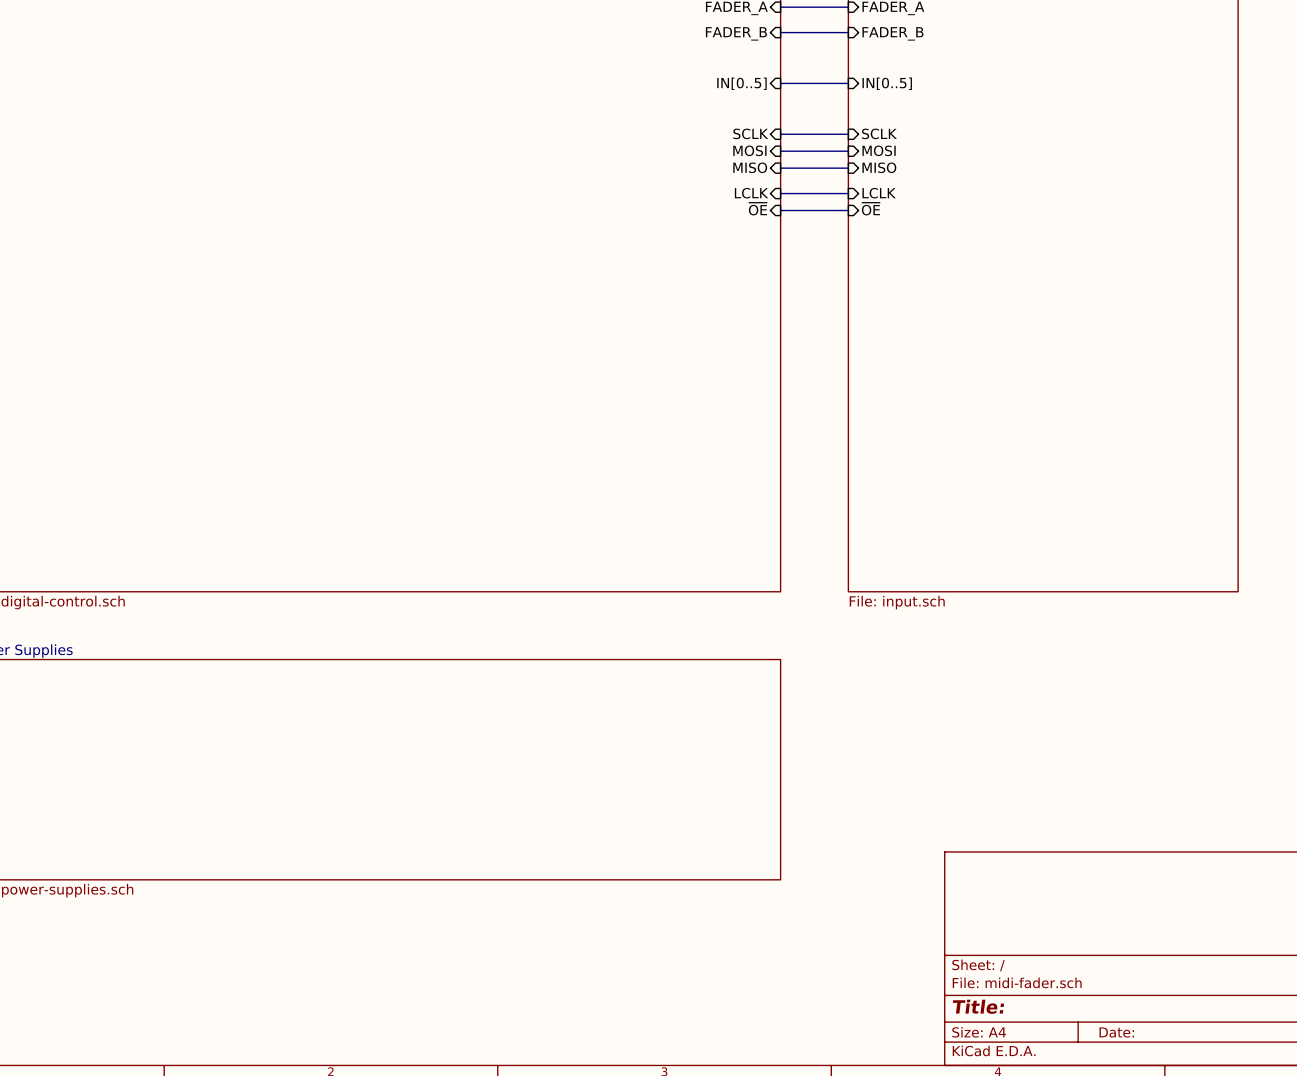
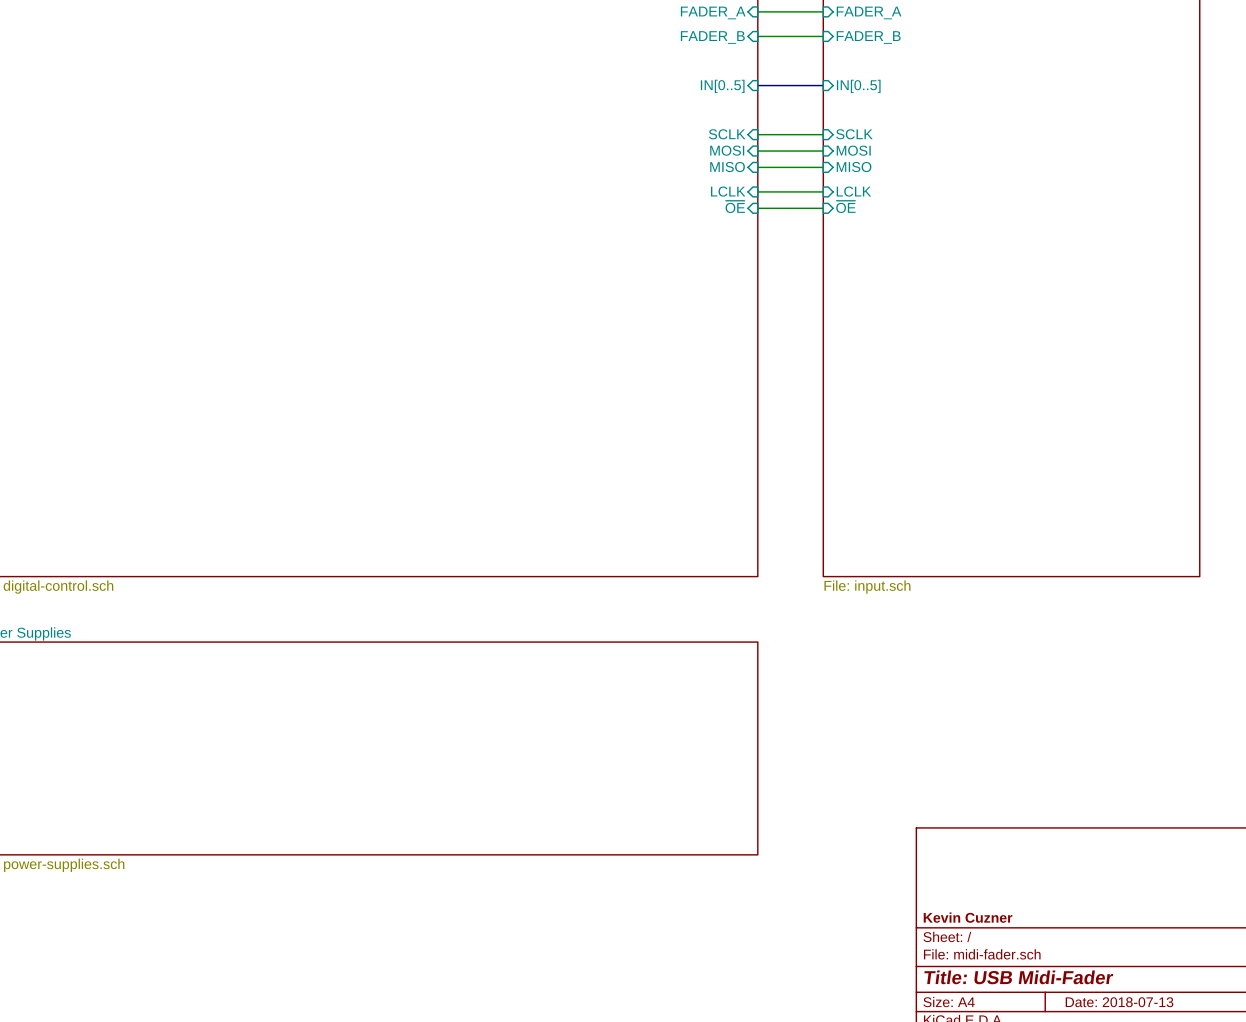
title block: none -> Kevin Cuzner (968, 917)
title block: Title: (978, 1006) -> Title: USB Midi-Fader (1018, 977)
title block: Date: (1116, 1032) -> Date: 2018-07-13 (1119, 1002)

